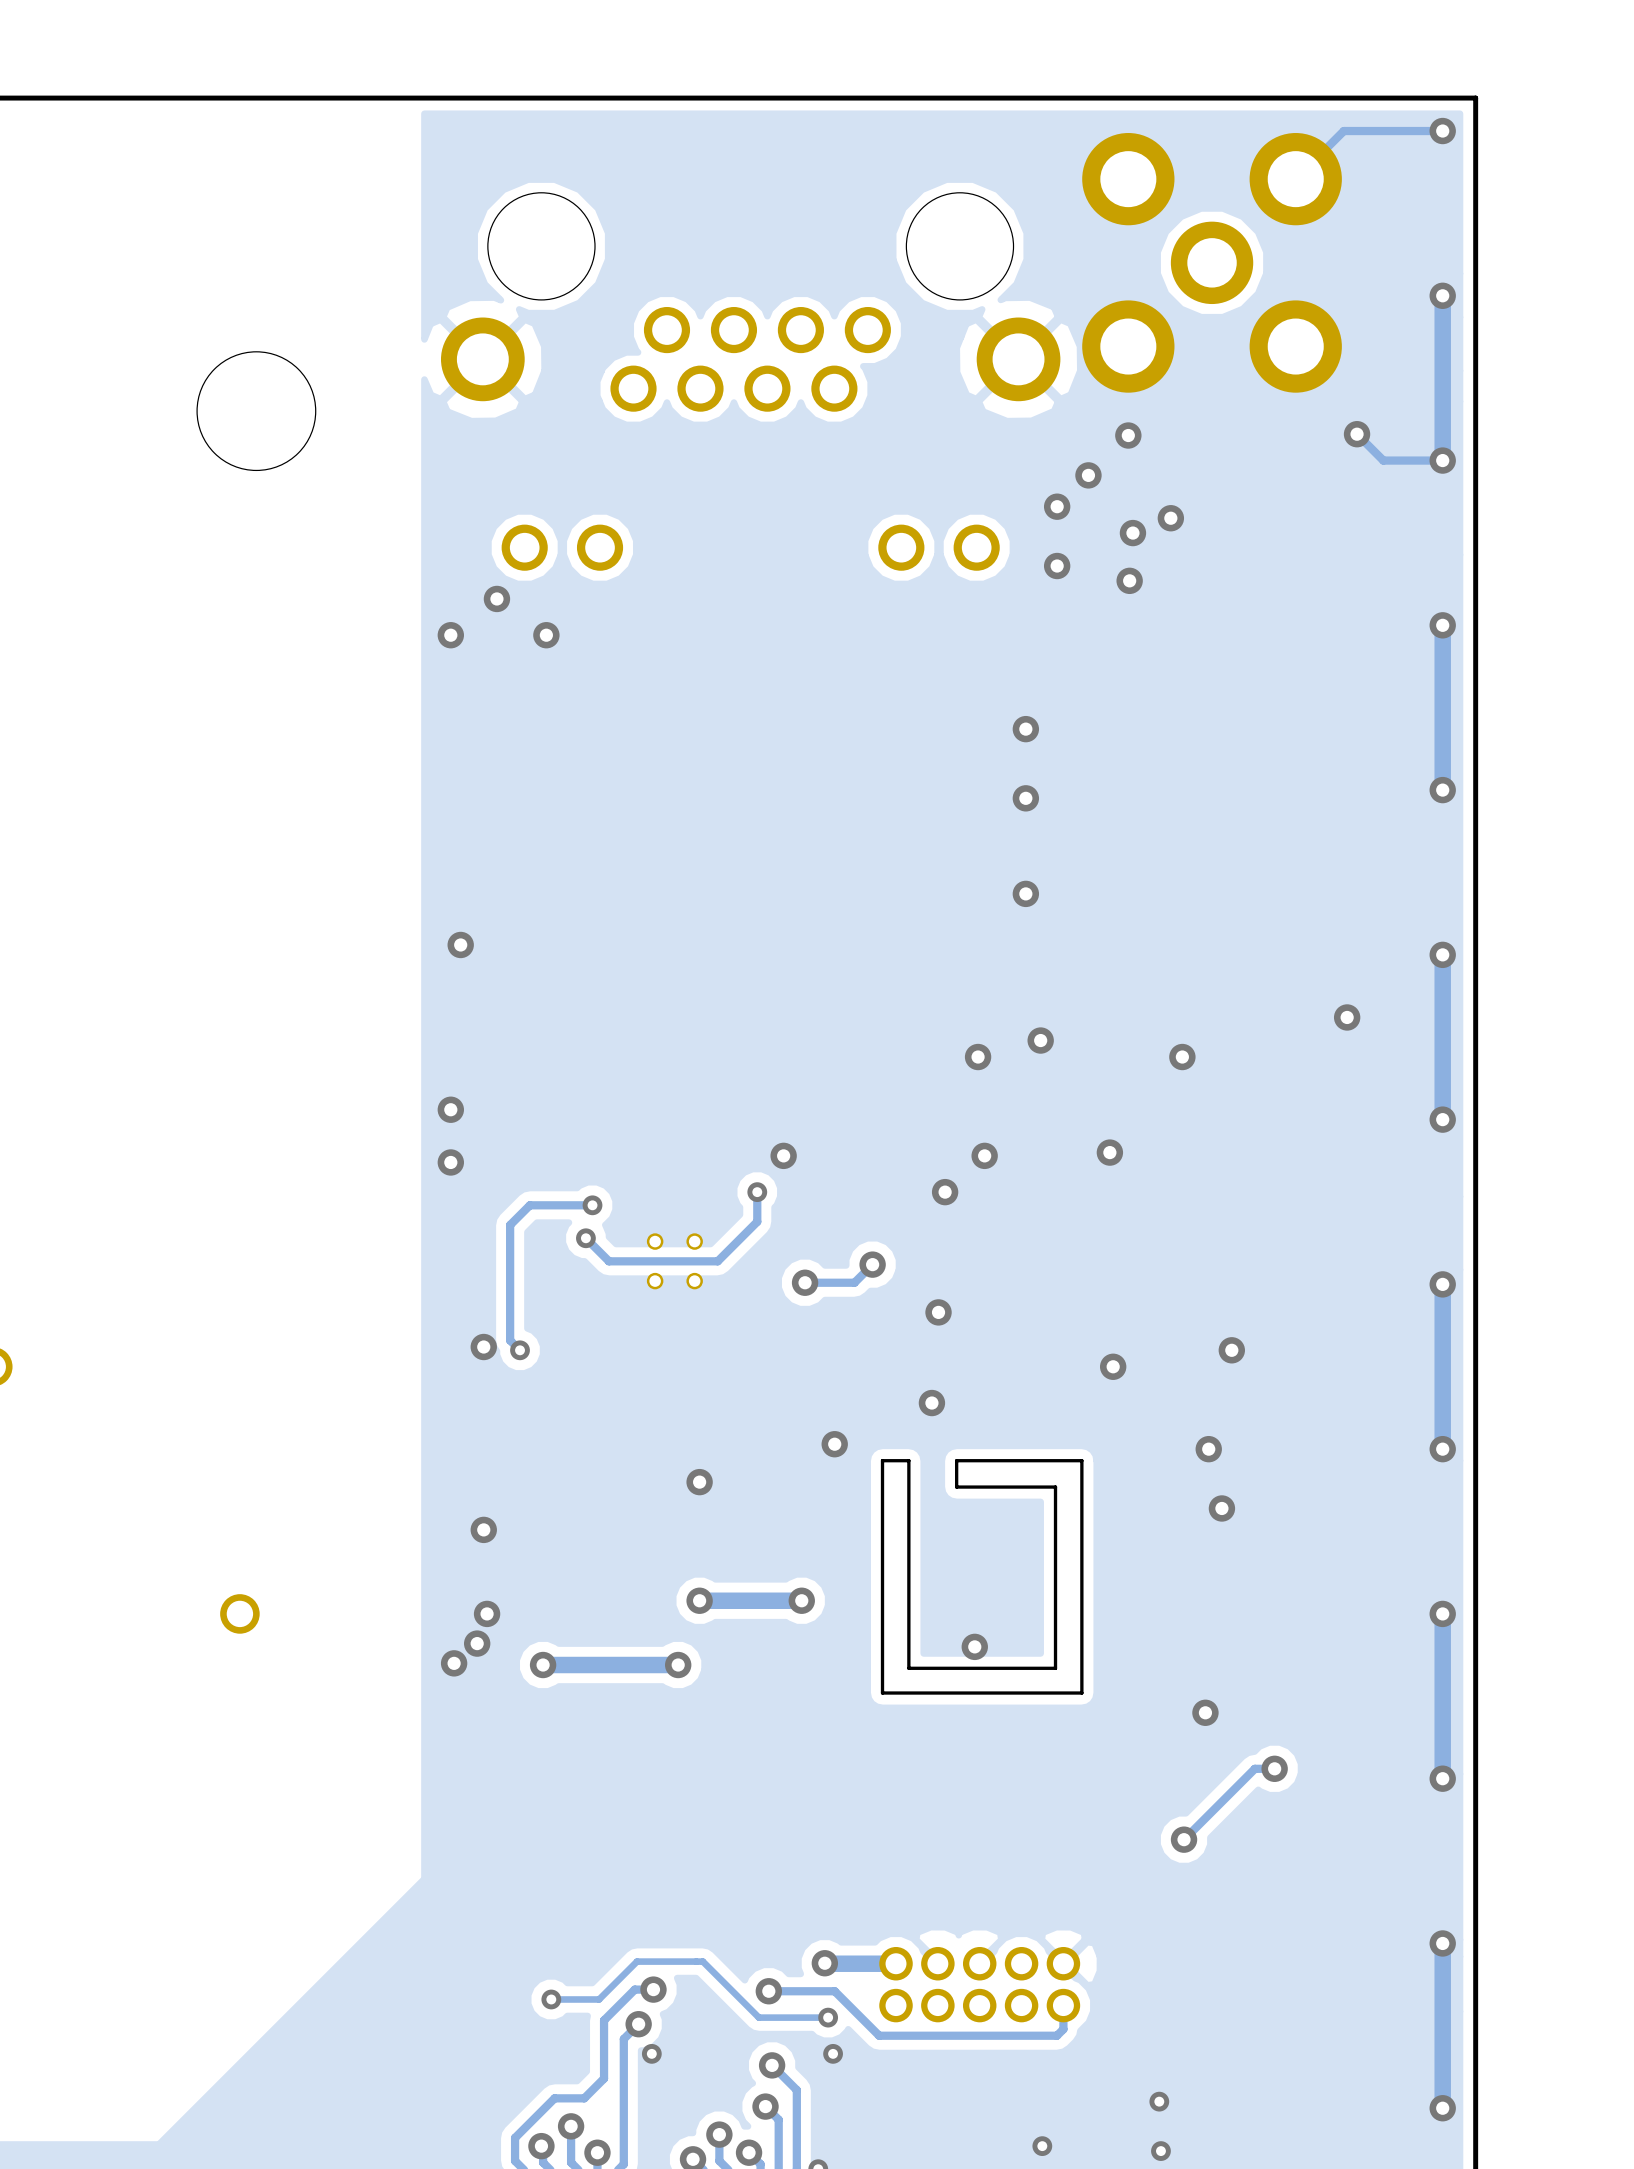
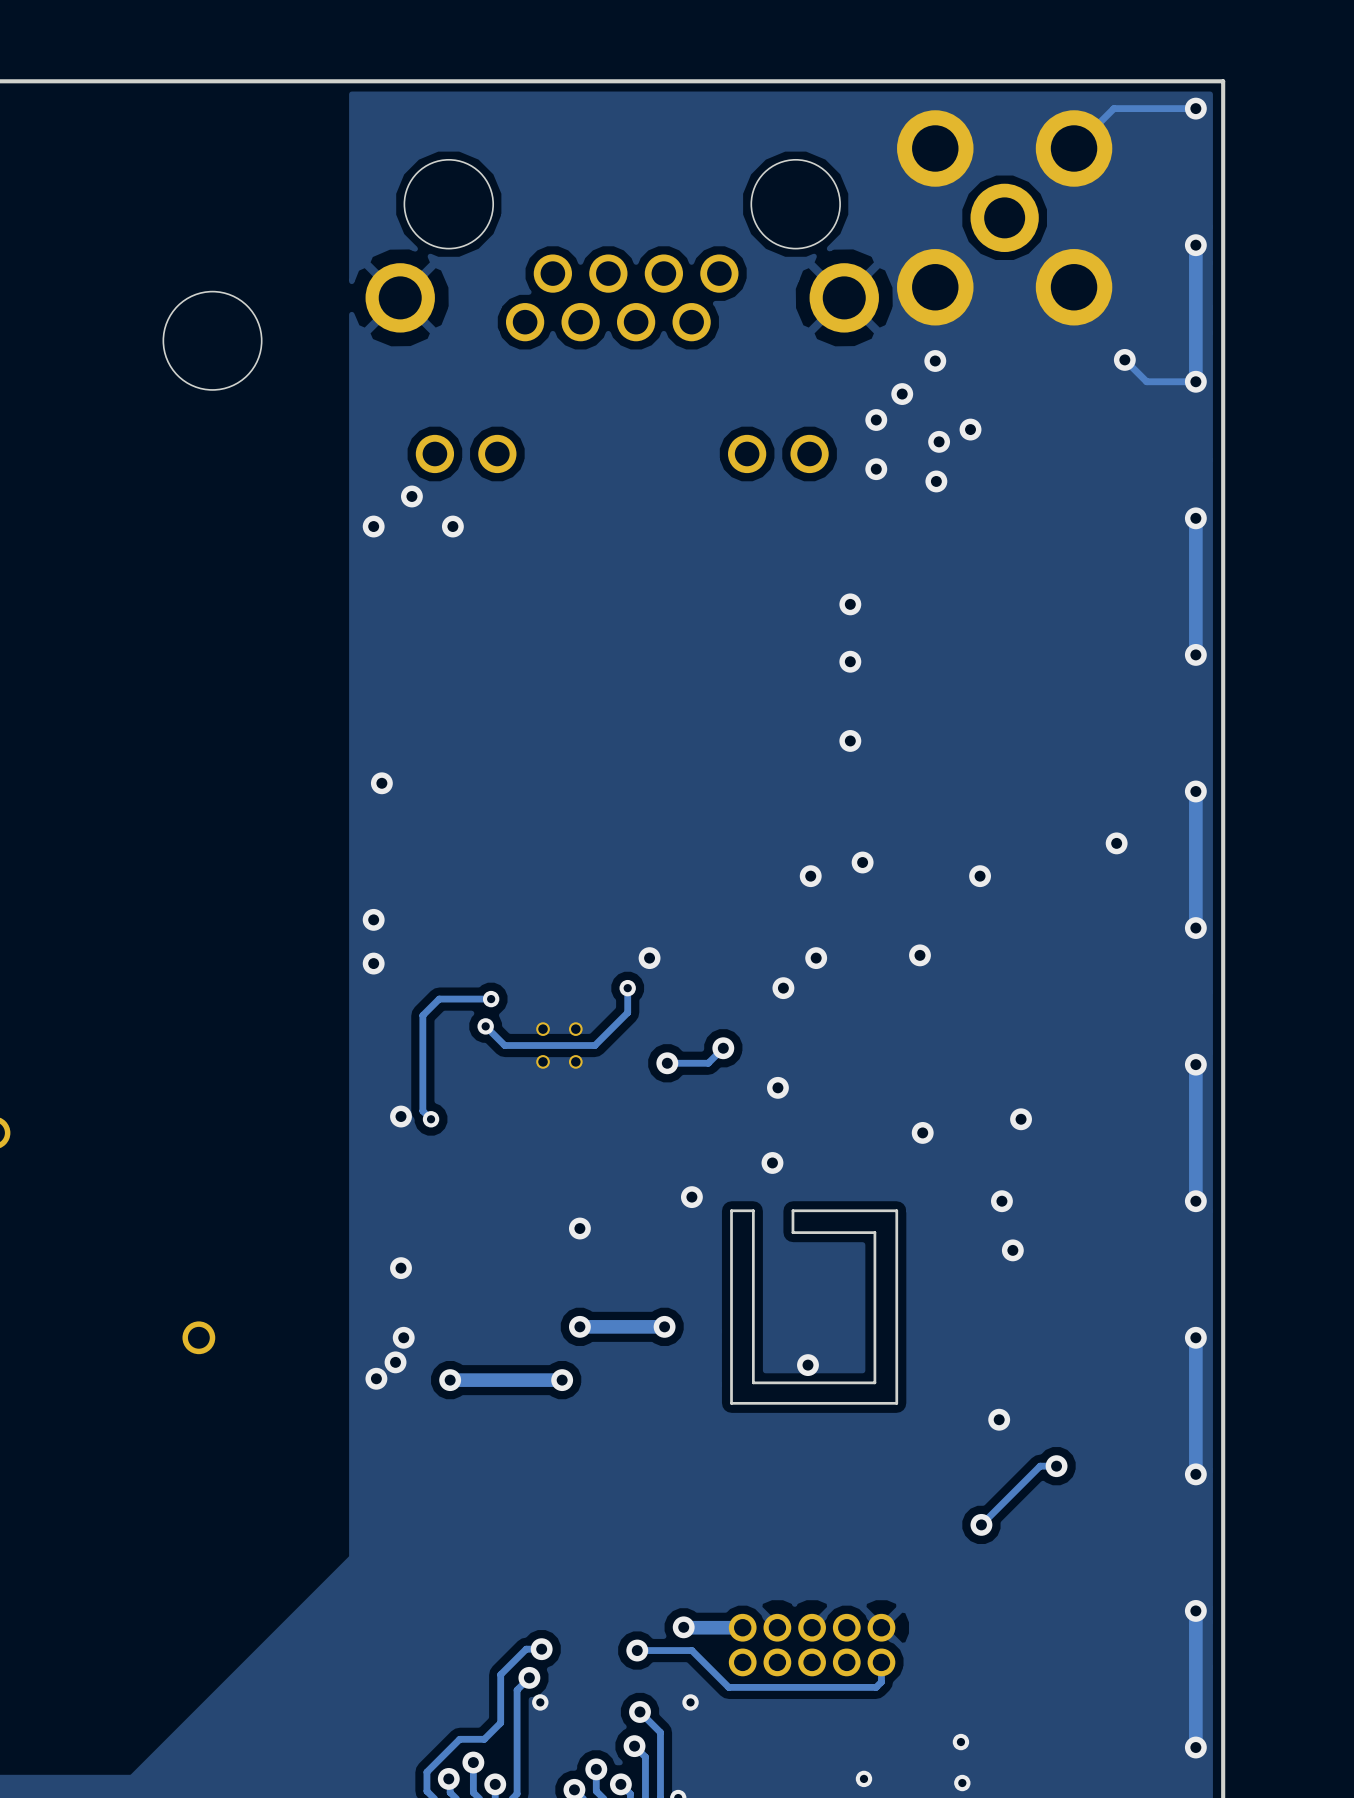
track: (551, 1999) (599, 1999) (637, 1961) (702, 1961) (758, 2017) (828, 2017) -> none
via: (551, 1999) -> none
via: (828, 2017) -> none

